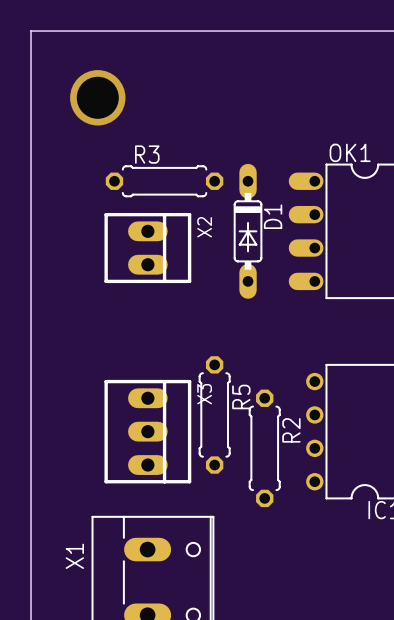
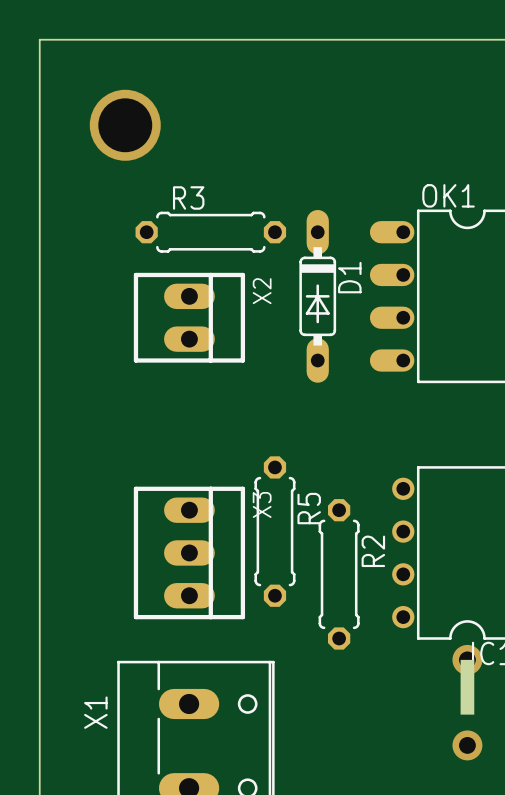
board edge: none -> (467, 659) (467, 745)
via: none -> (467, 659)
via: none -> (467, 745)

